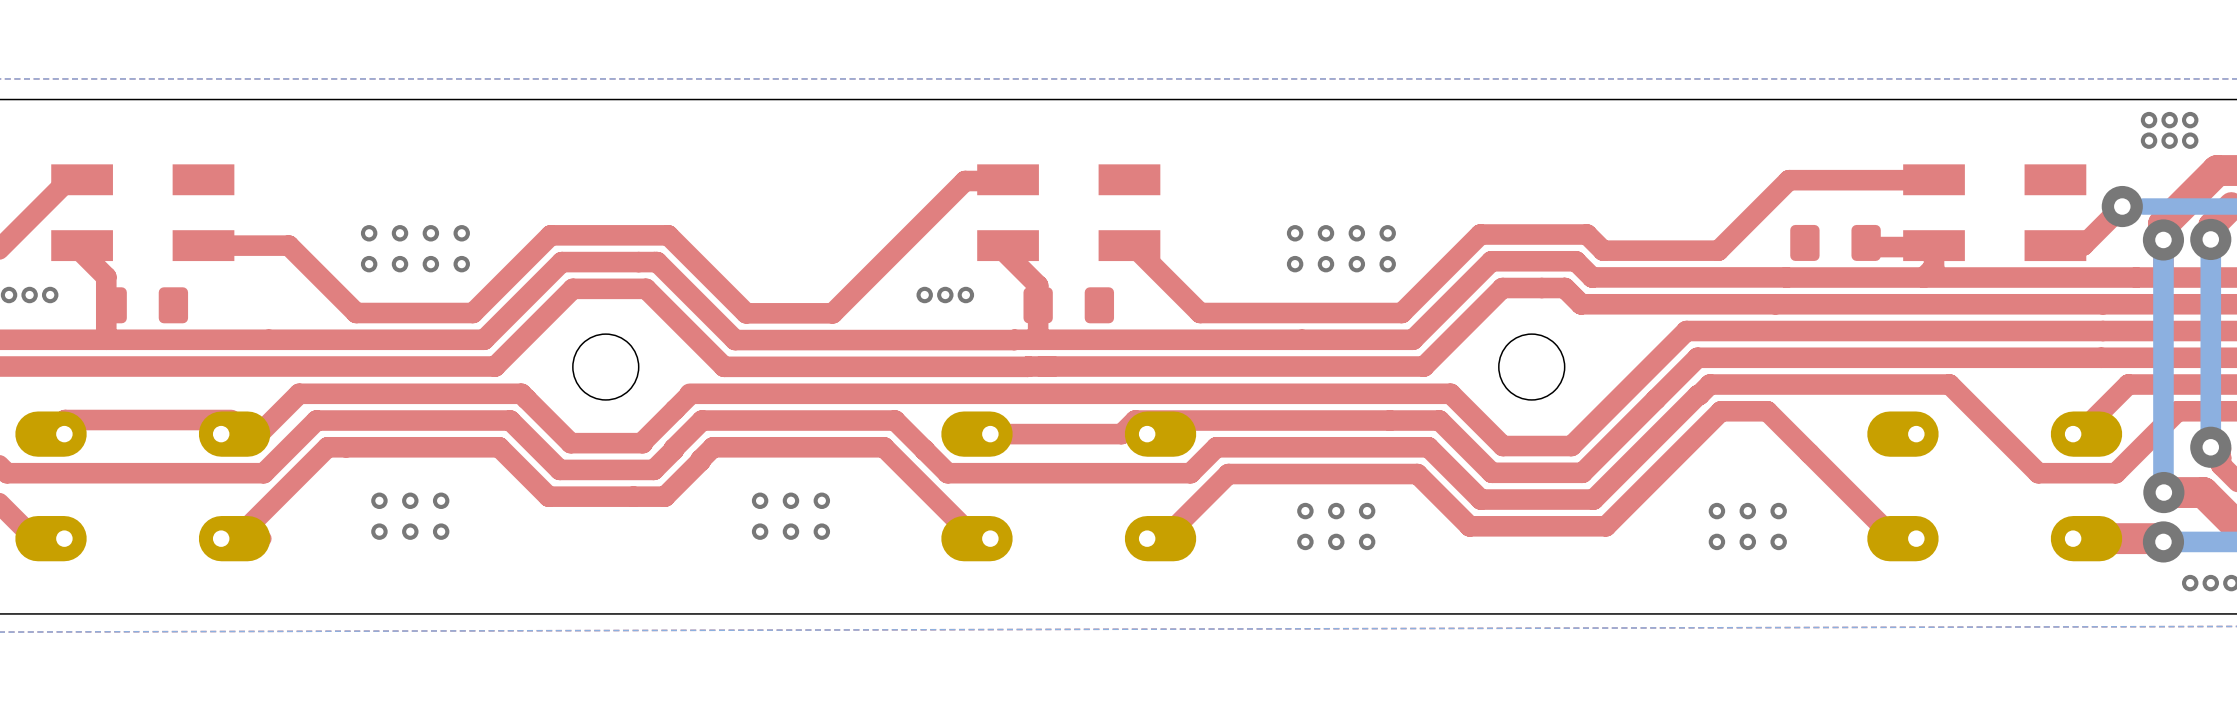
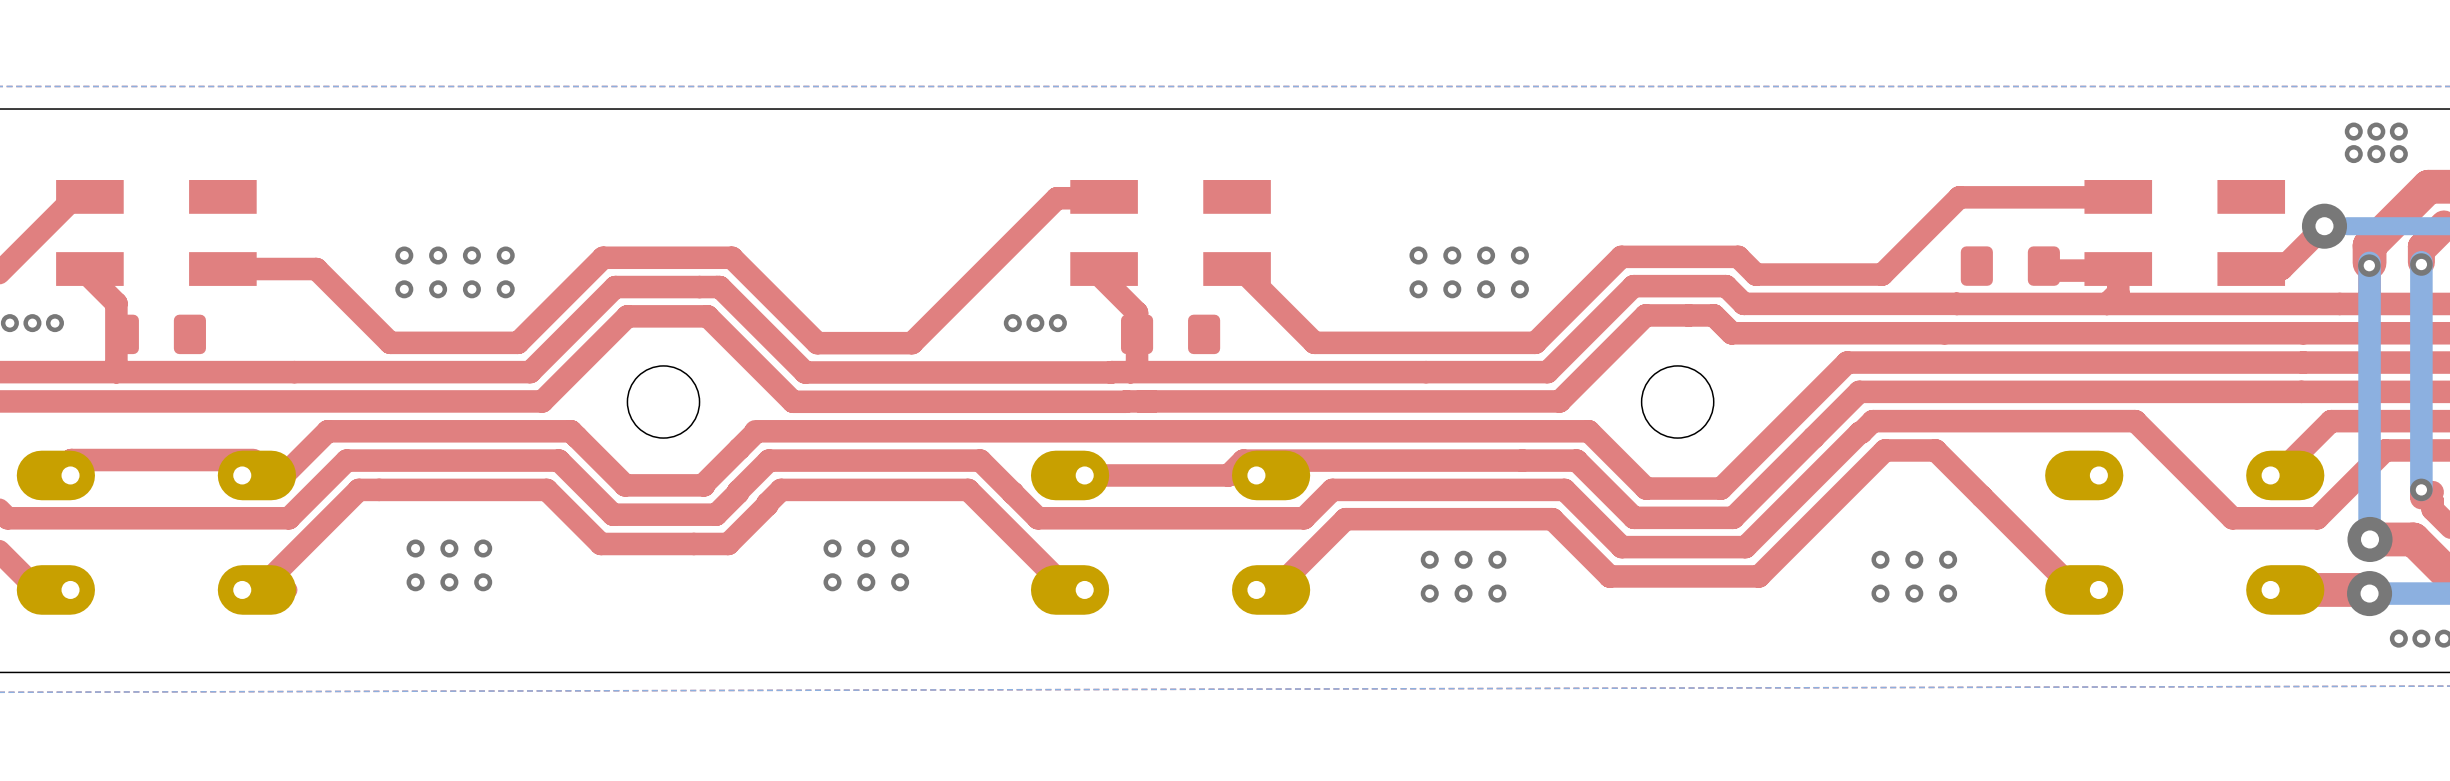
via size: [2190, 218, 2232, 261] -> [2410, 253, 2433, 276]
via size: [2142, 219, 2185, 261] -> [2358, 254, 2381, 277]
via size: [2190, 426, 2232, 468] -> [2410, 478, 2433, 502]

